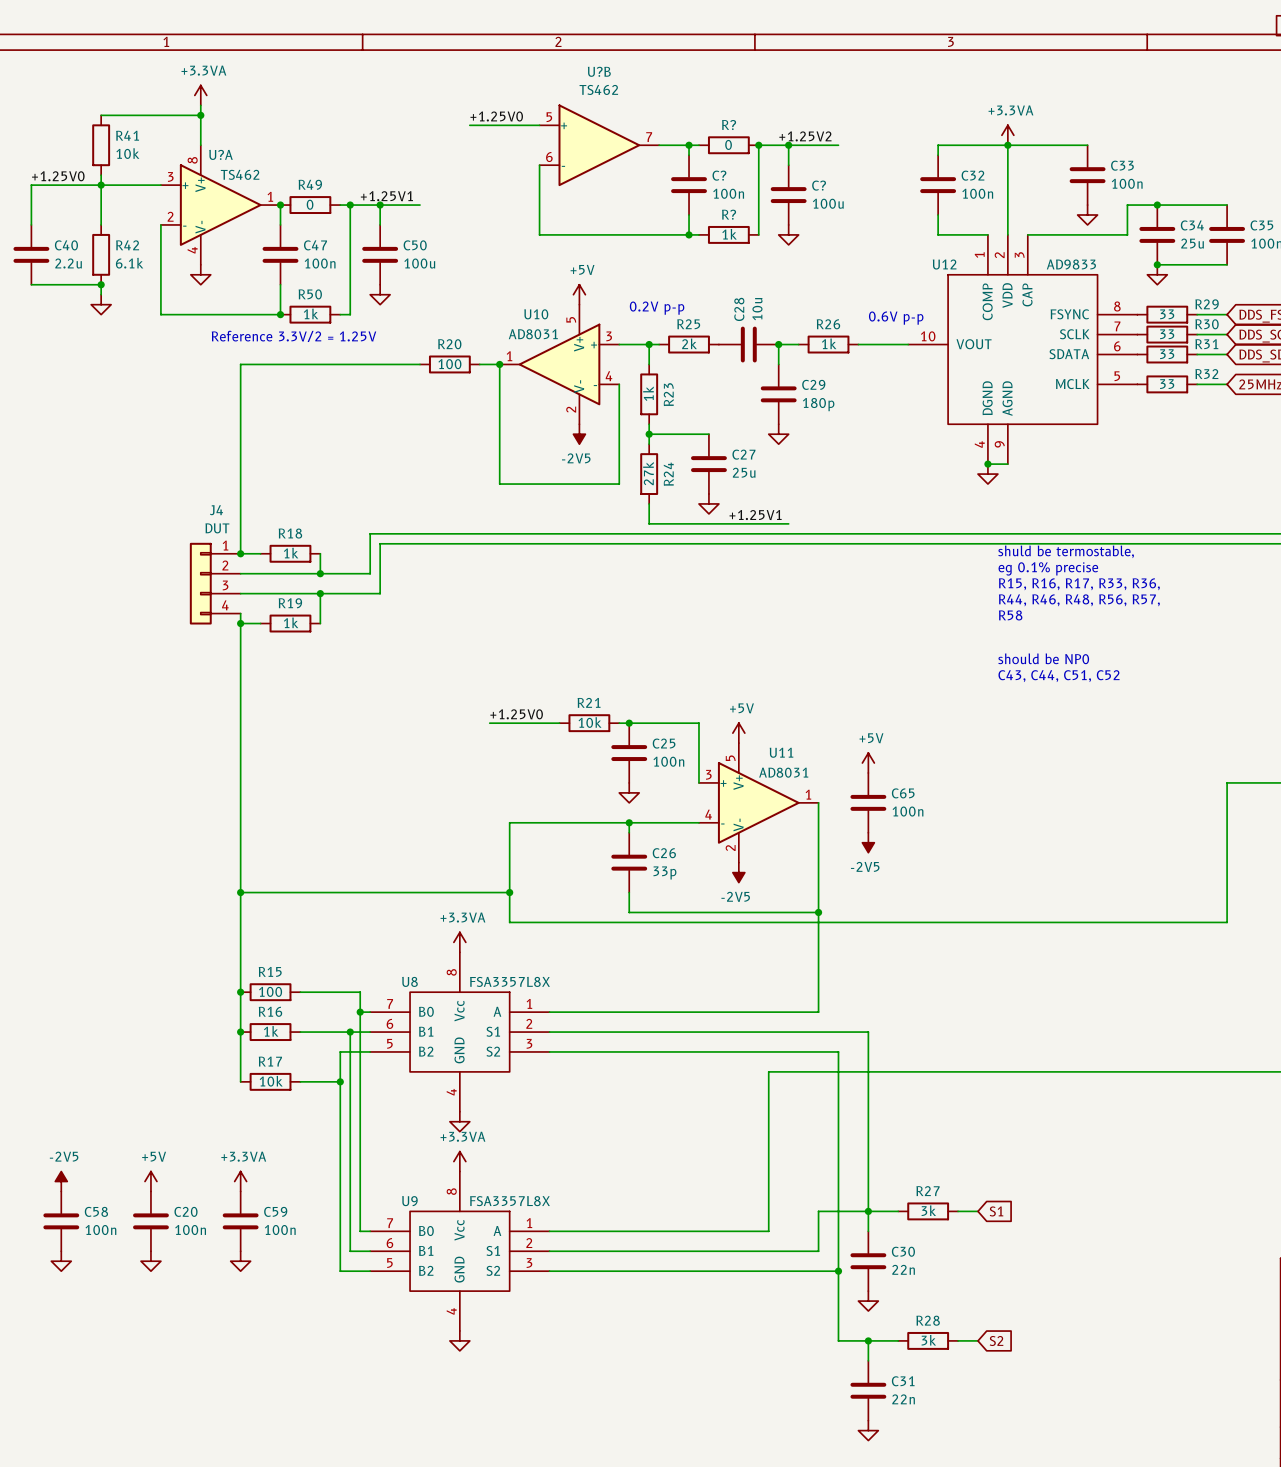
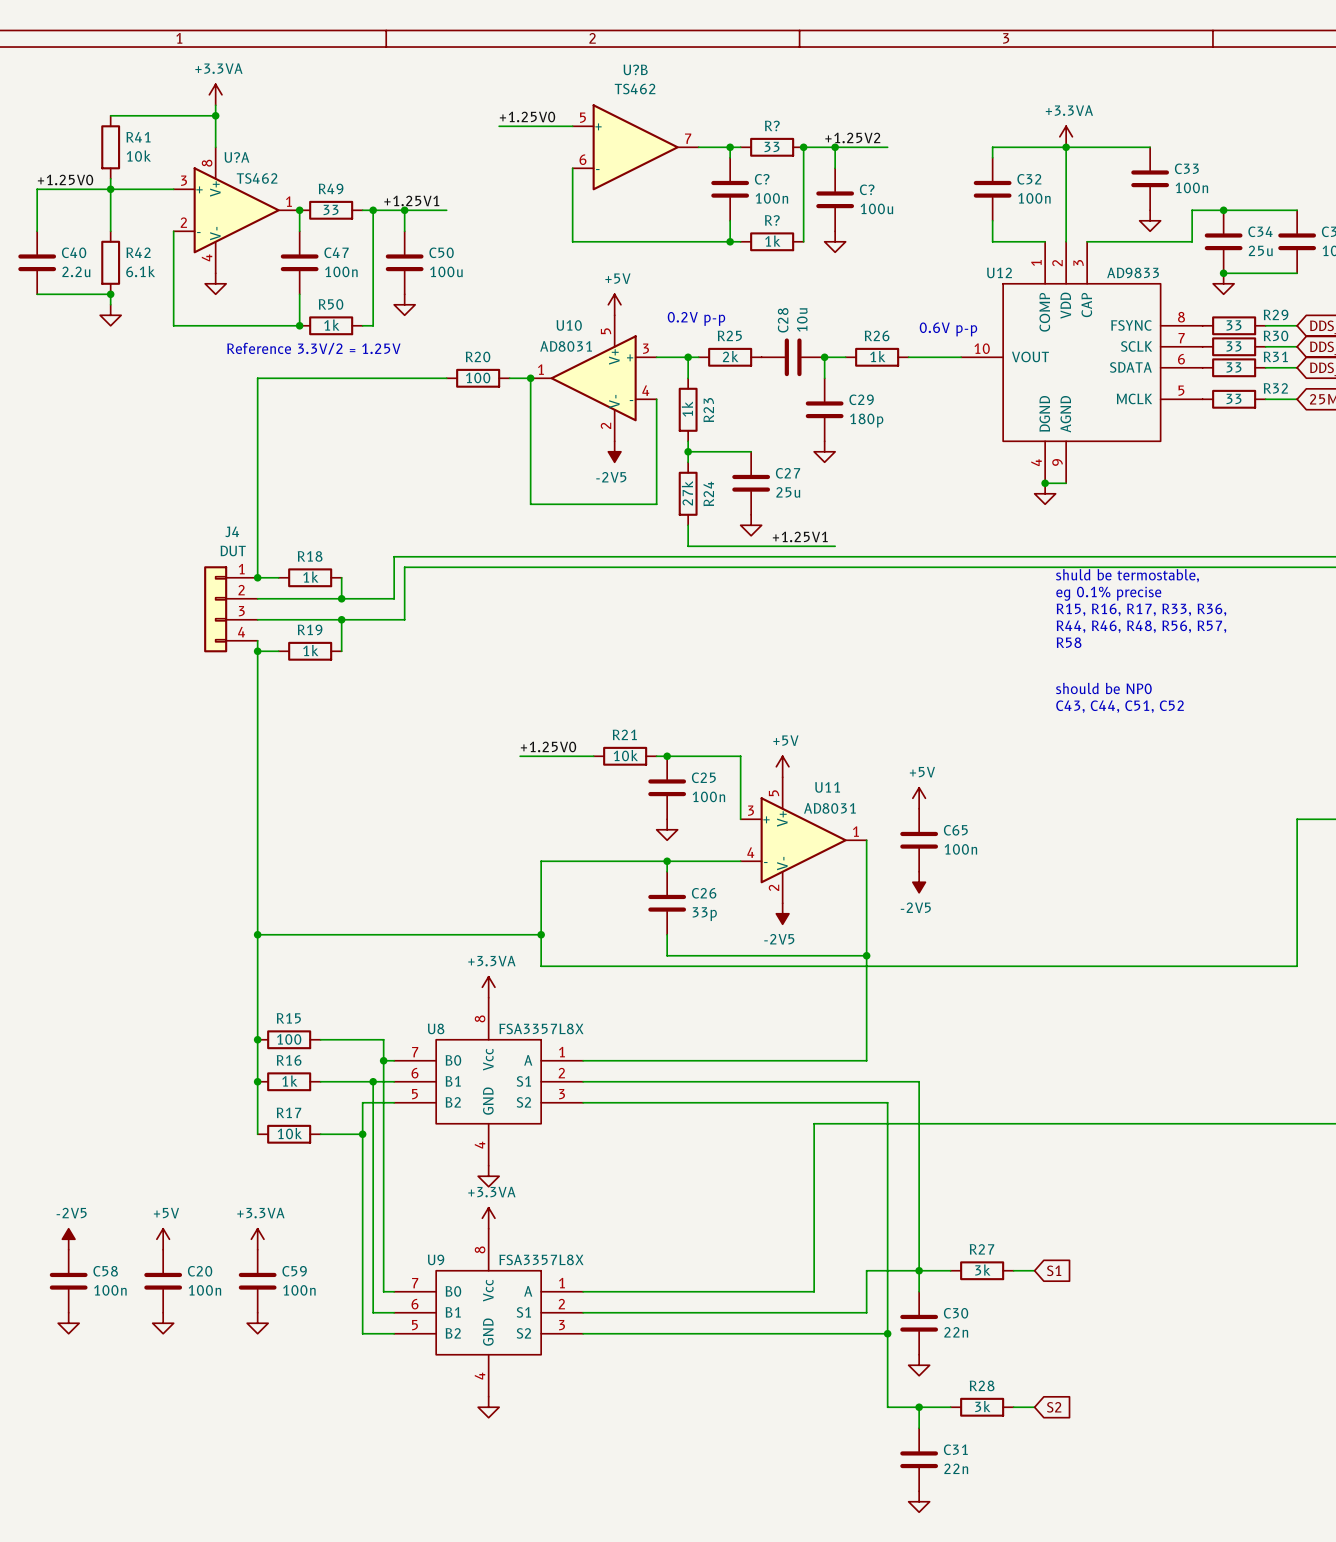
R? value: 0 (728, 144) -> 33 (772, 146)
R49 value: 0 (310, 204) -> 33 (331, 209)

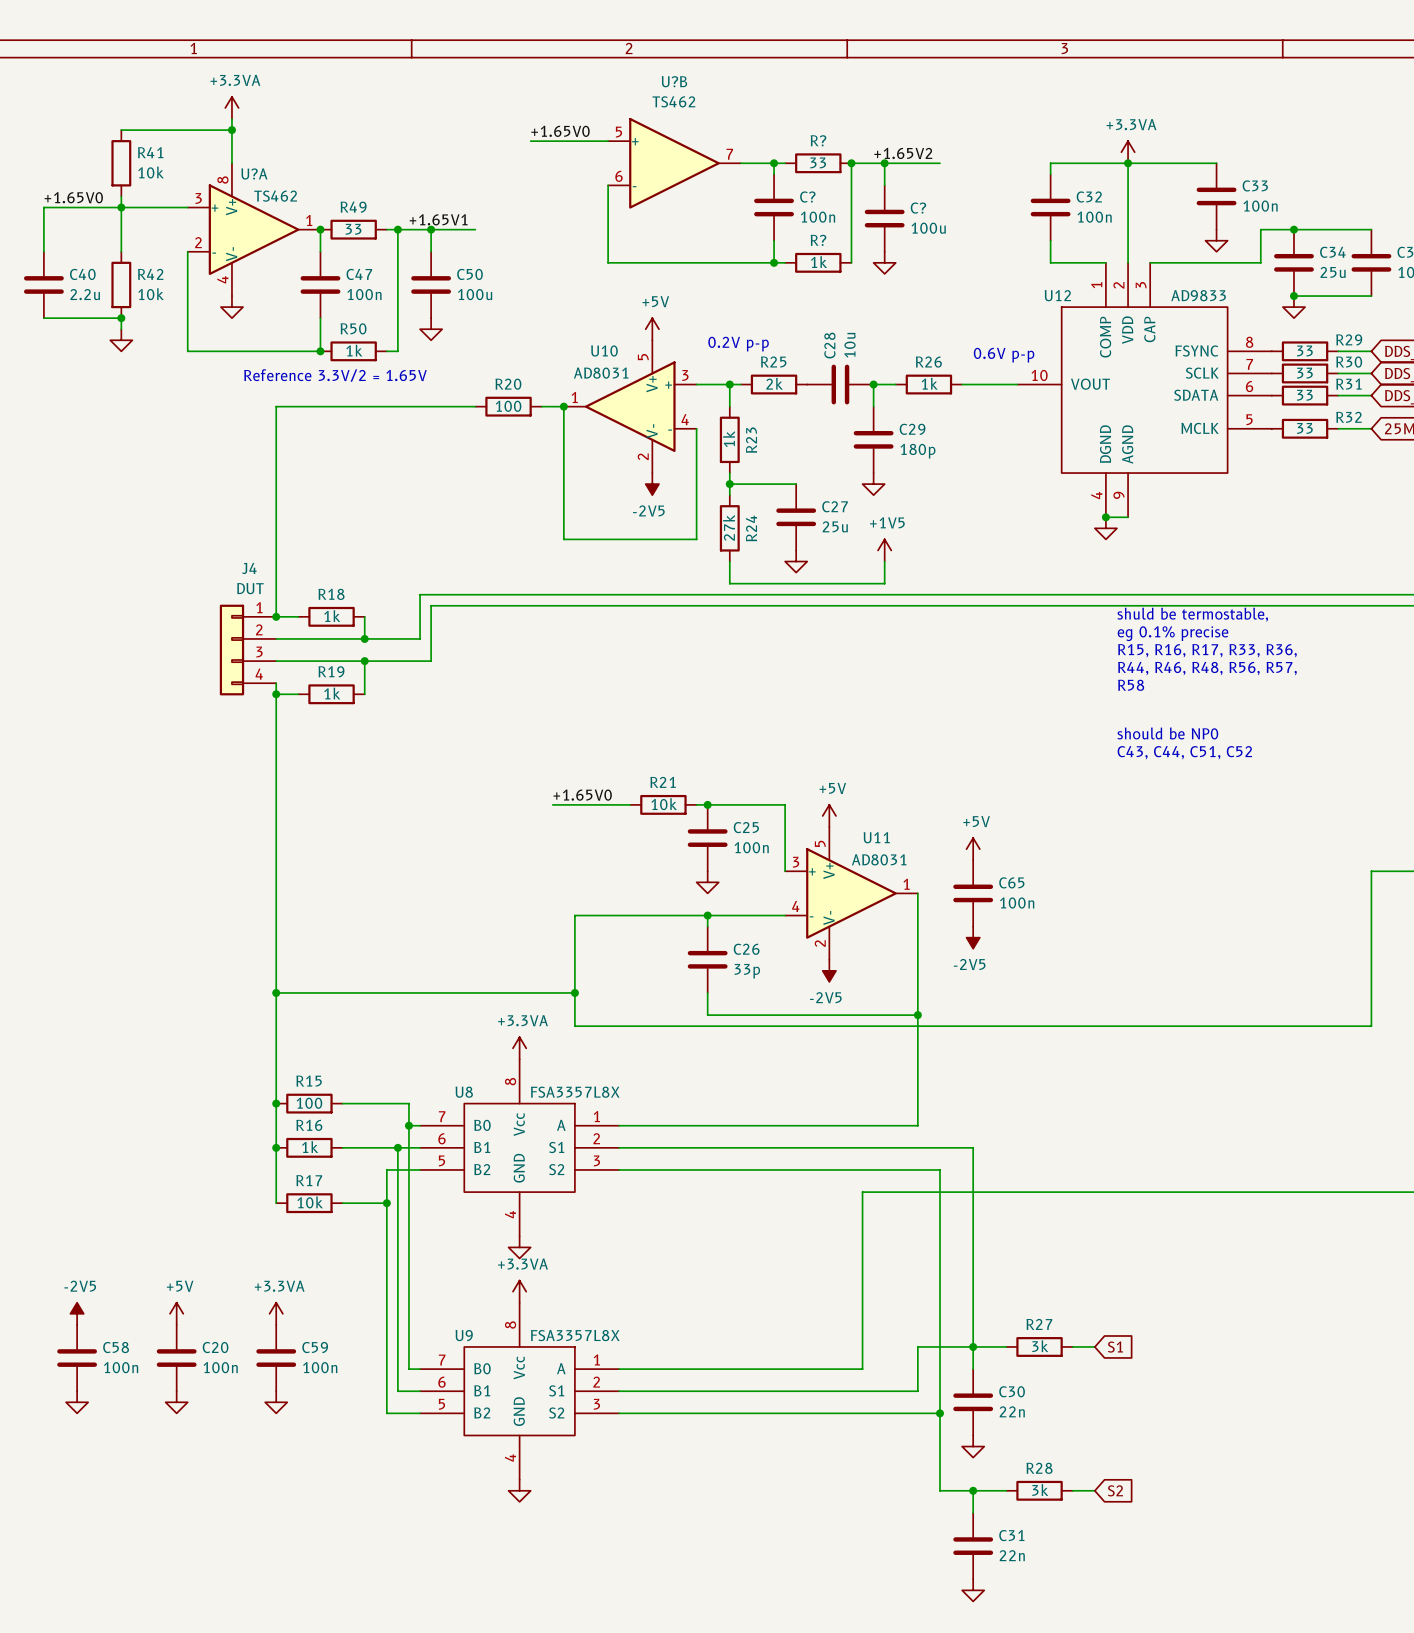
label: +1.25V0 (527, 116) -> +1.65V0 (560, 131)
label: +1.25V2 (852, 137) -> +1.65V2 (903, 153)
label: +1.25V0 (65, 179) -> +1.65V0 (73, 197)
label: +1.25V1 (411, 200) -> +1.65V1 (438, 219)
R42 value: 6.1k (140, 271) -> 10k (151, 294)
text: Reference 3.3V/2 = 1.25V (313, 348) -> Reference 3.3V/2 = 1.65V (335, 375)
power symbol: none -> +1V5 (884, 550)
wire: none -> (884, 561) (884, 583)
label: +1.25V1 (800, 536) -> none
label: +1.25V0 (548, 746) -> +1.65V0 (582, 795)

